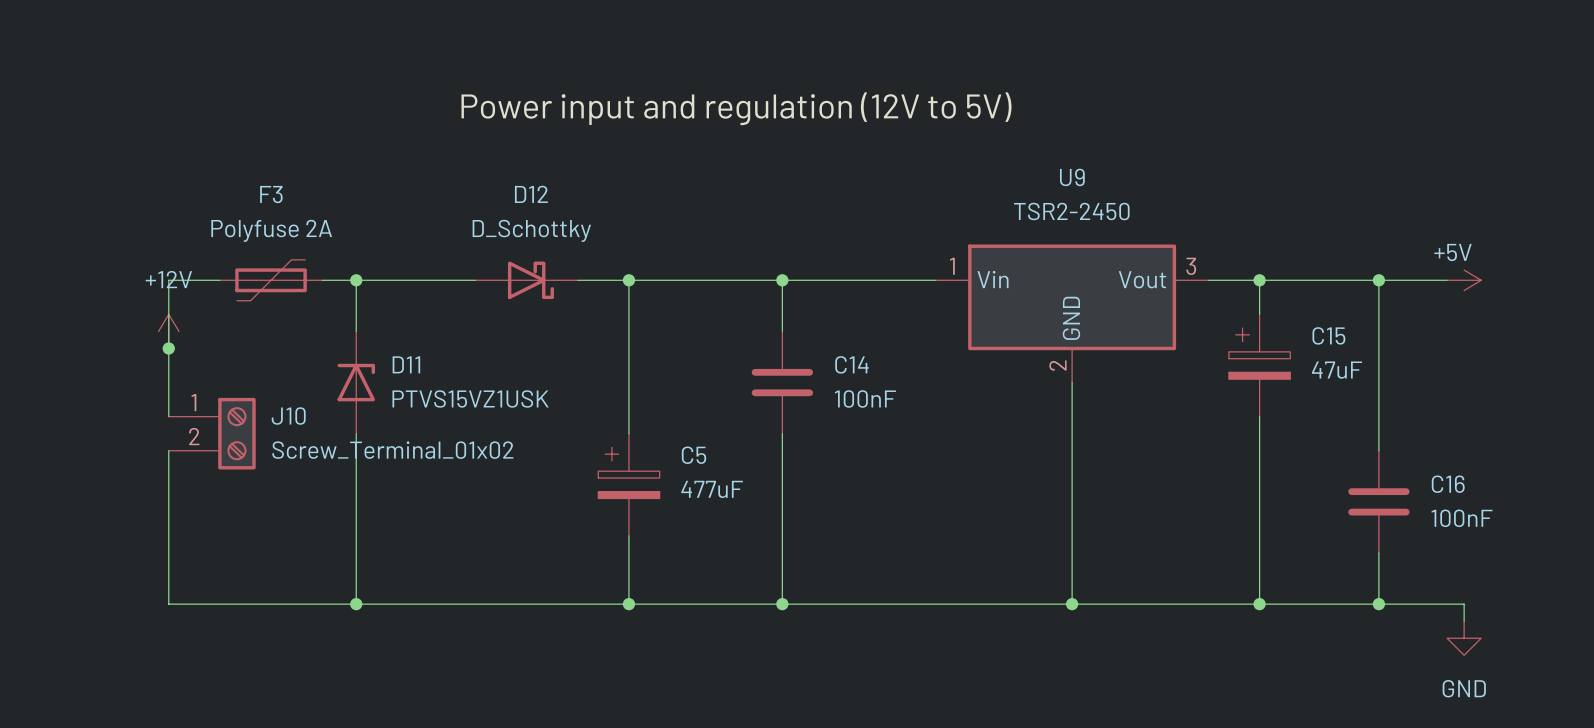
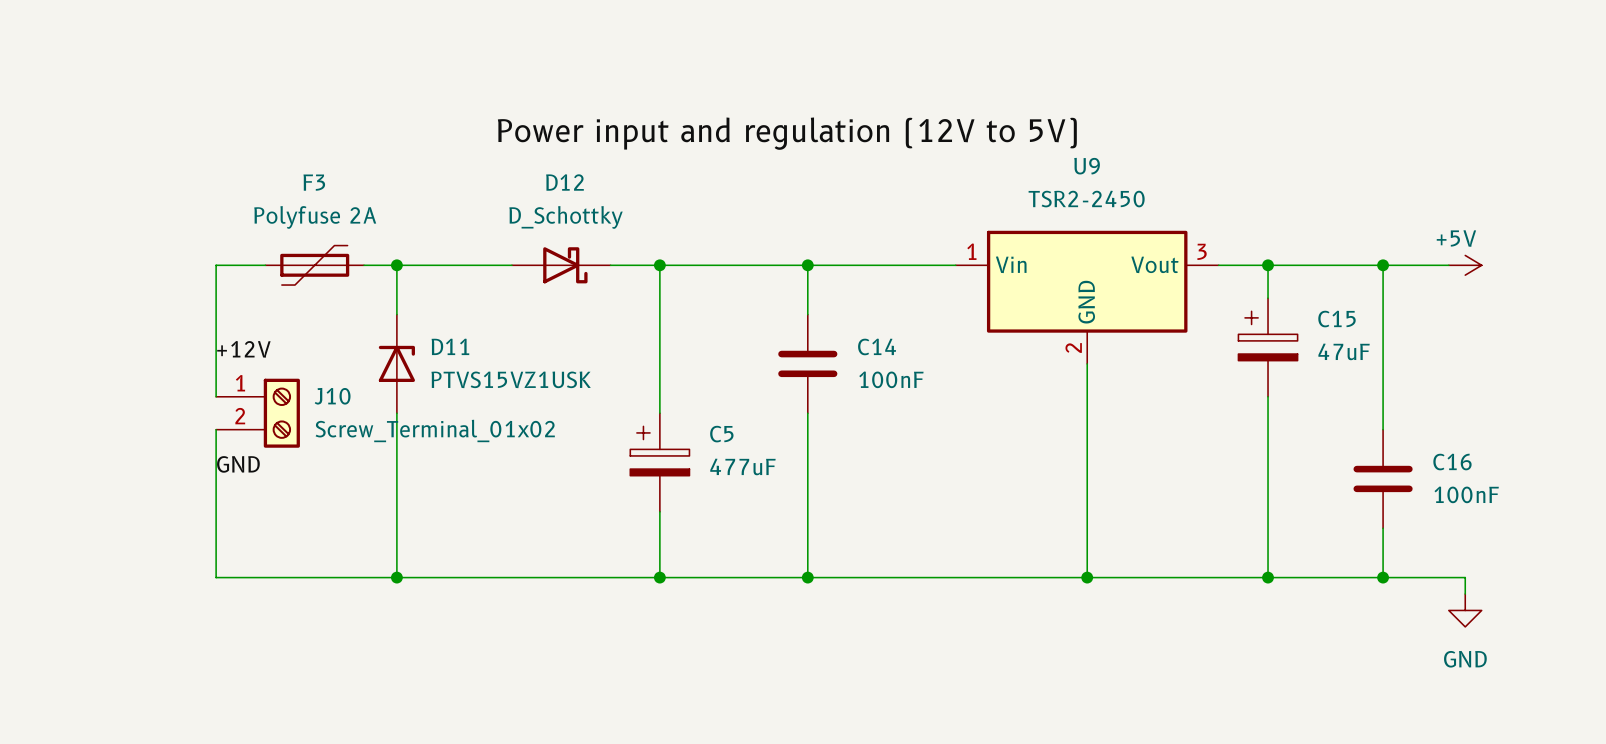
label position: Power input and regulation (12V to 5V) (736, 108) -> Power input and regulation (12V to 5V) (787, 133)
power symbol: +12V (168, 331) -> none
junction: (168, 348) -> none
label: none -> +12V (243, 349)
label: none -> GND (238, 464)

